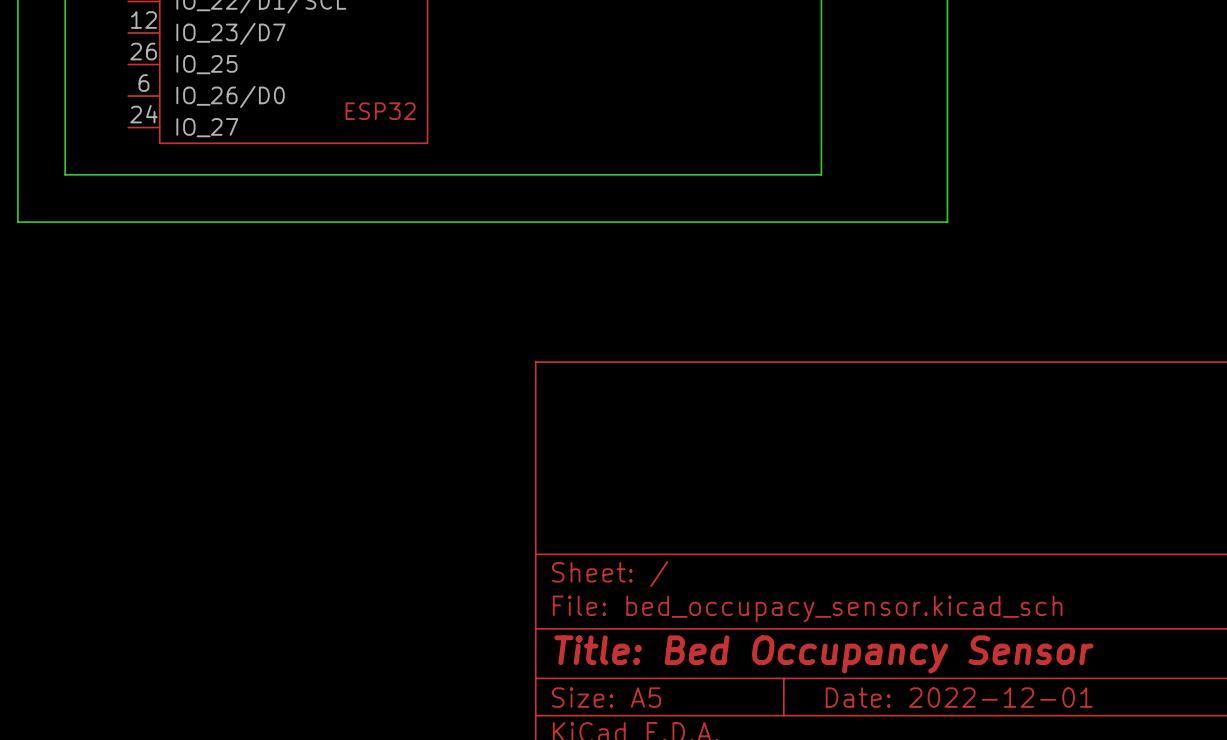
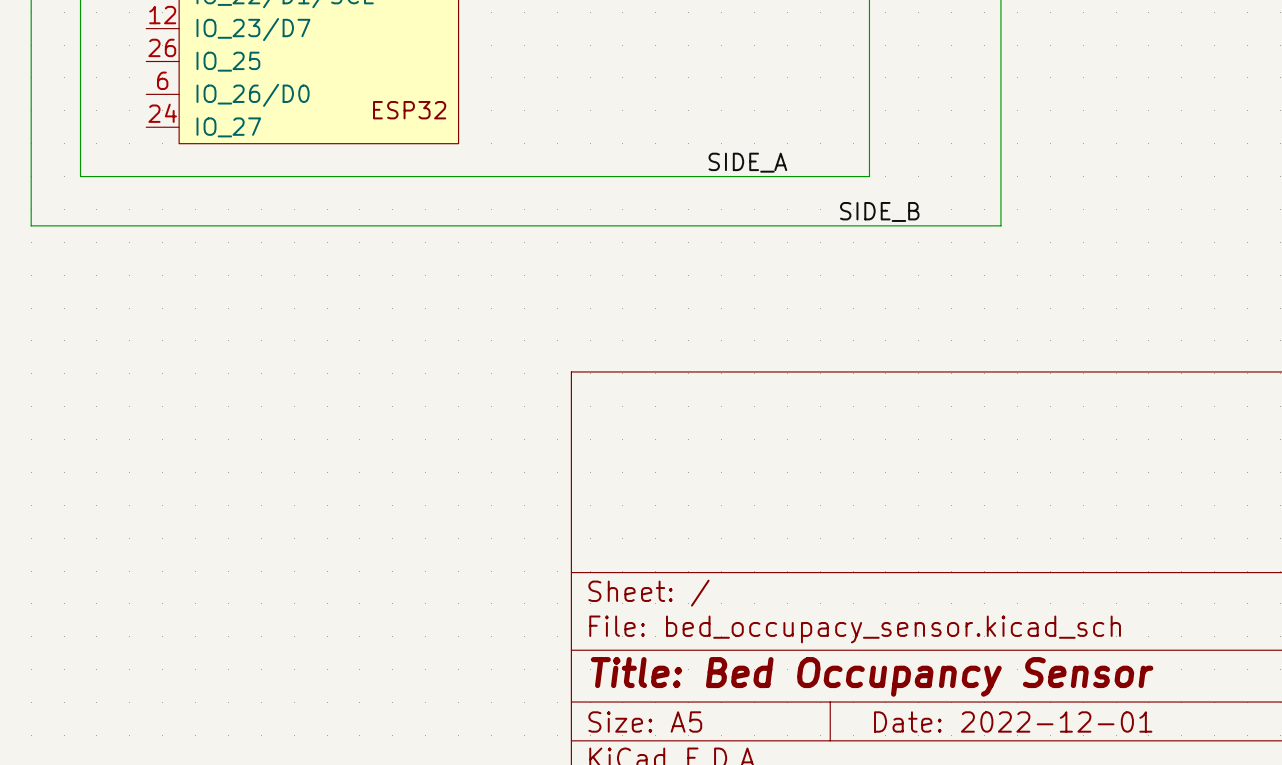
label: none -> SIDE_A (747, 162)
label: none -> SIDE_B (879, 211)

